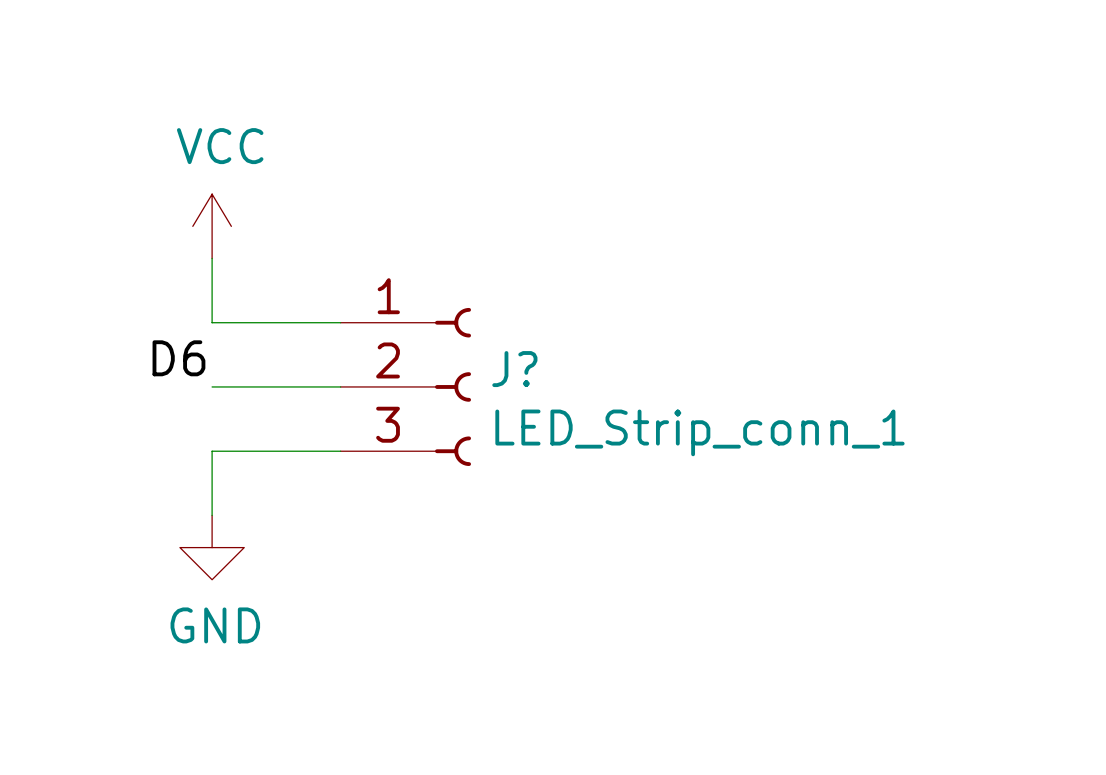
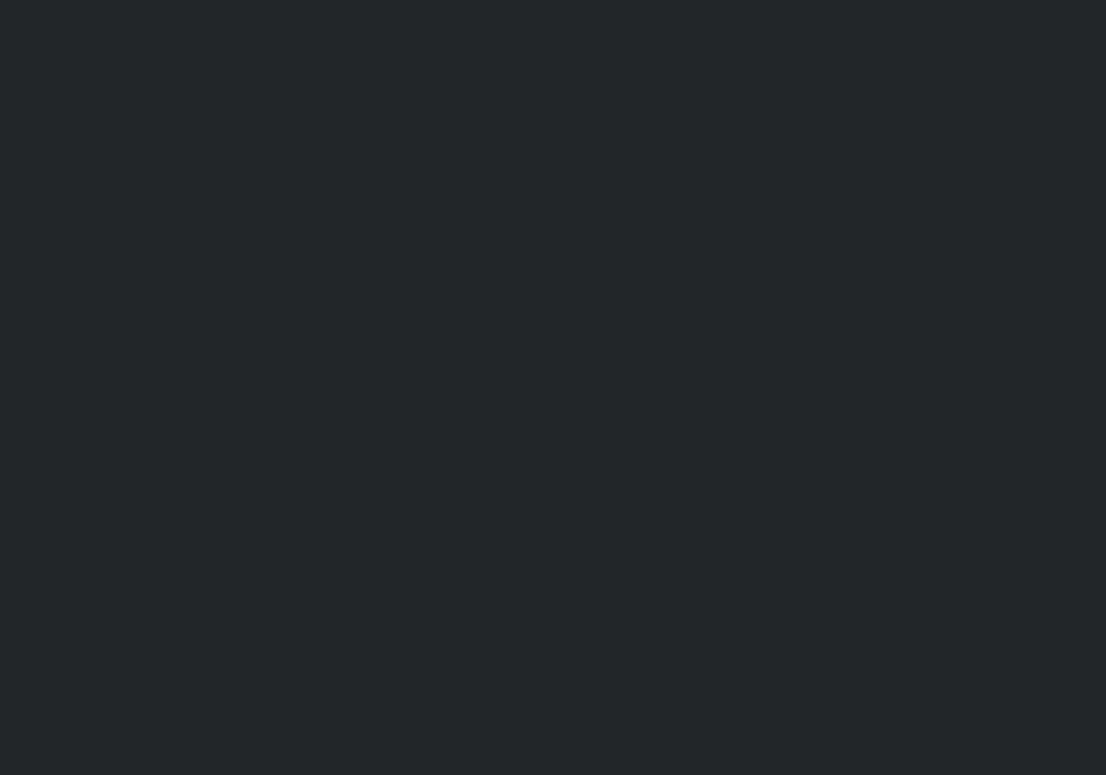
power symbol: VCC (212, 226) -> none
wire: (212, 258) (212, 322) (340, 322) -> none
label: D6 (178, 358) -> none
wire: (212, 386) (340, 386) -> none
J?: LED_Strip_conn_1 (405, 386) -> none
wire: (340, 451) (212, 451) (212, 515) -> none
power symbol: GND (212, 547) -> none

